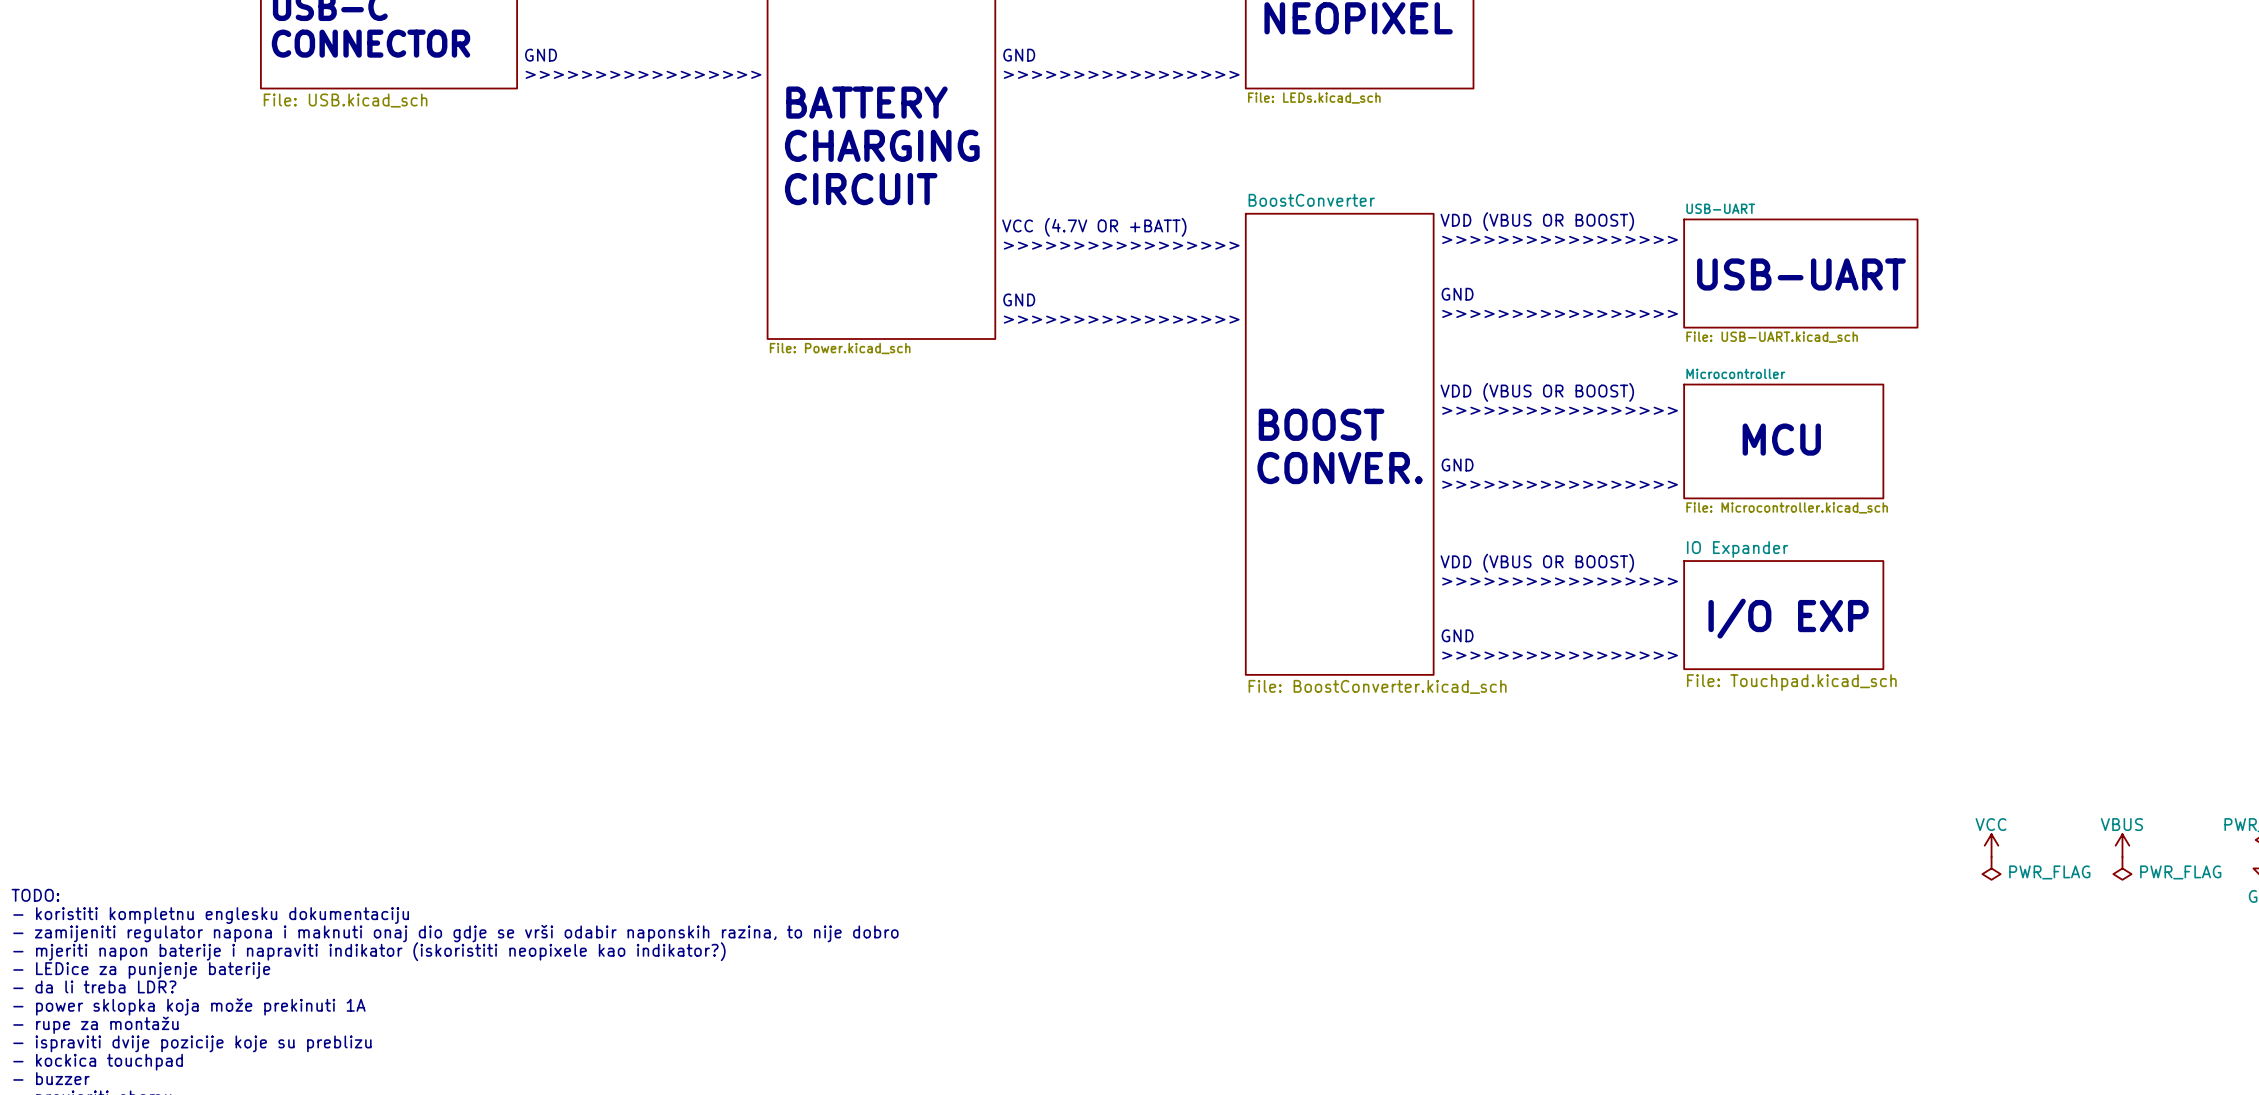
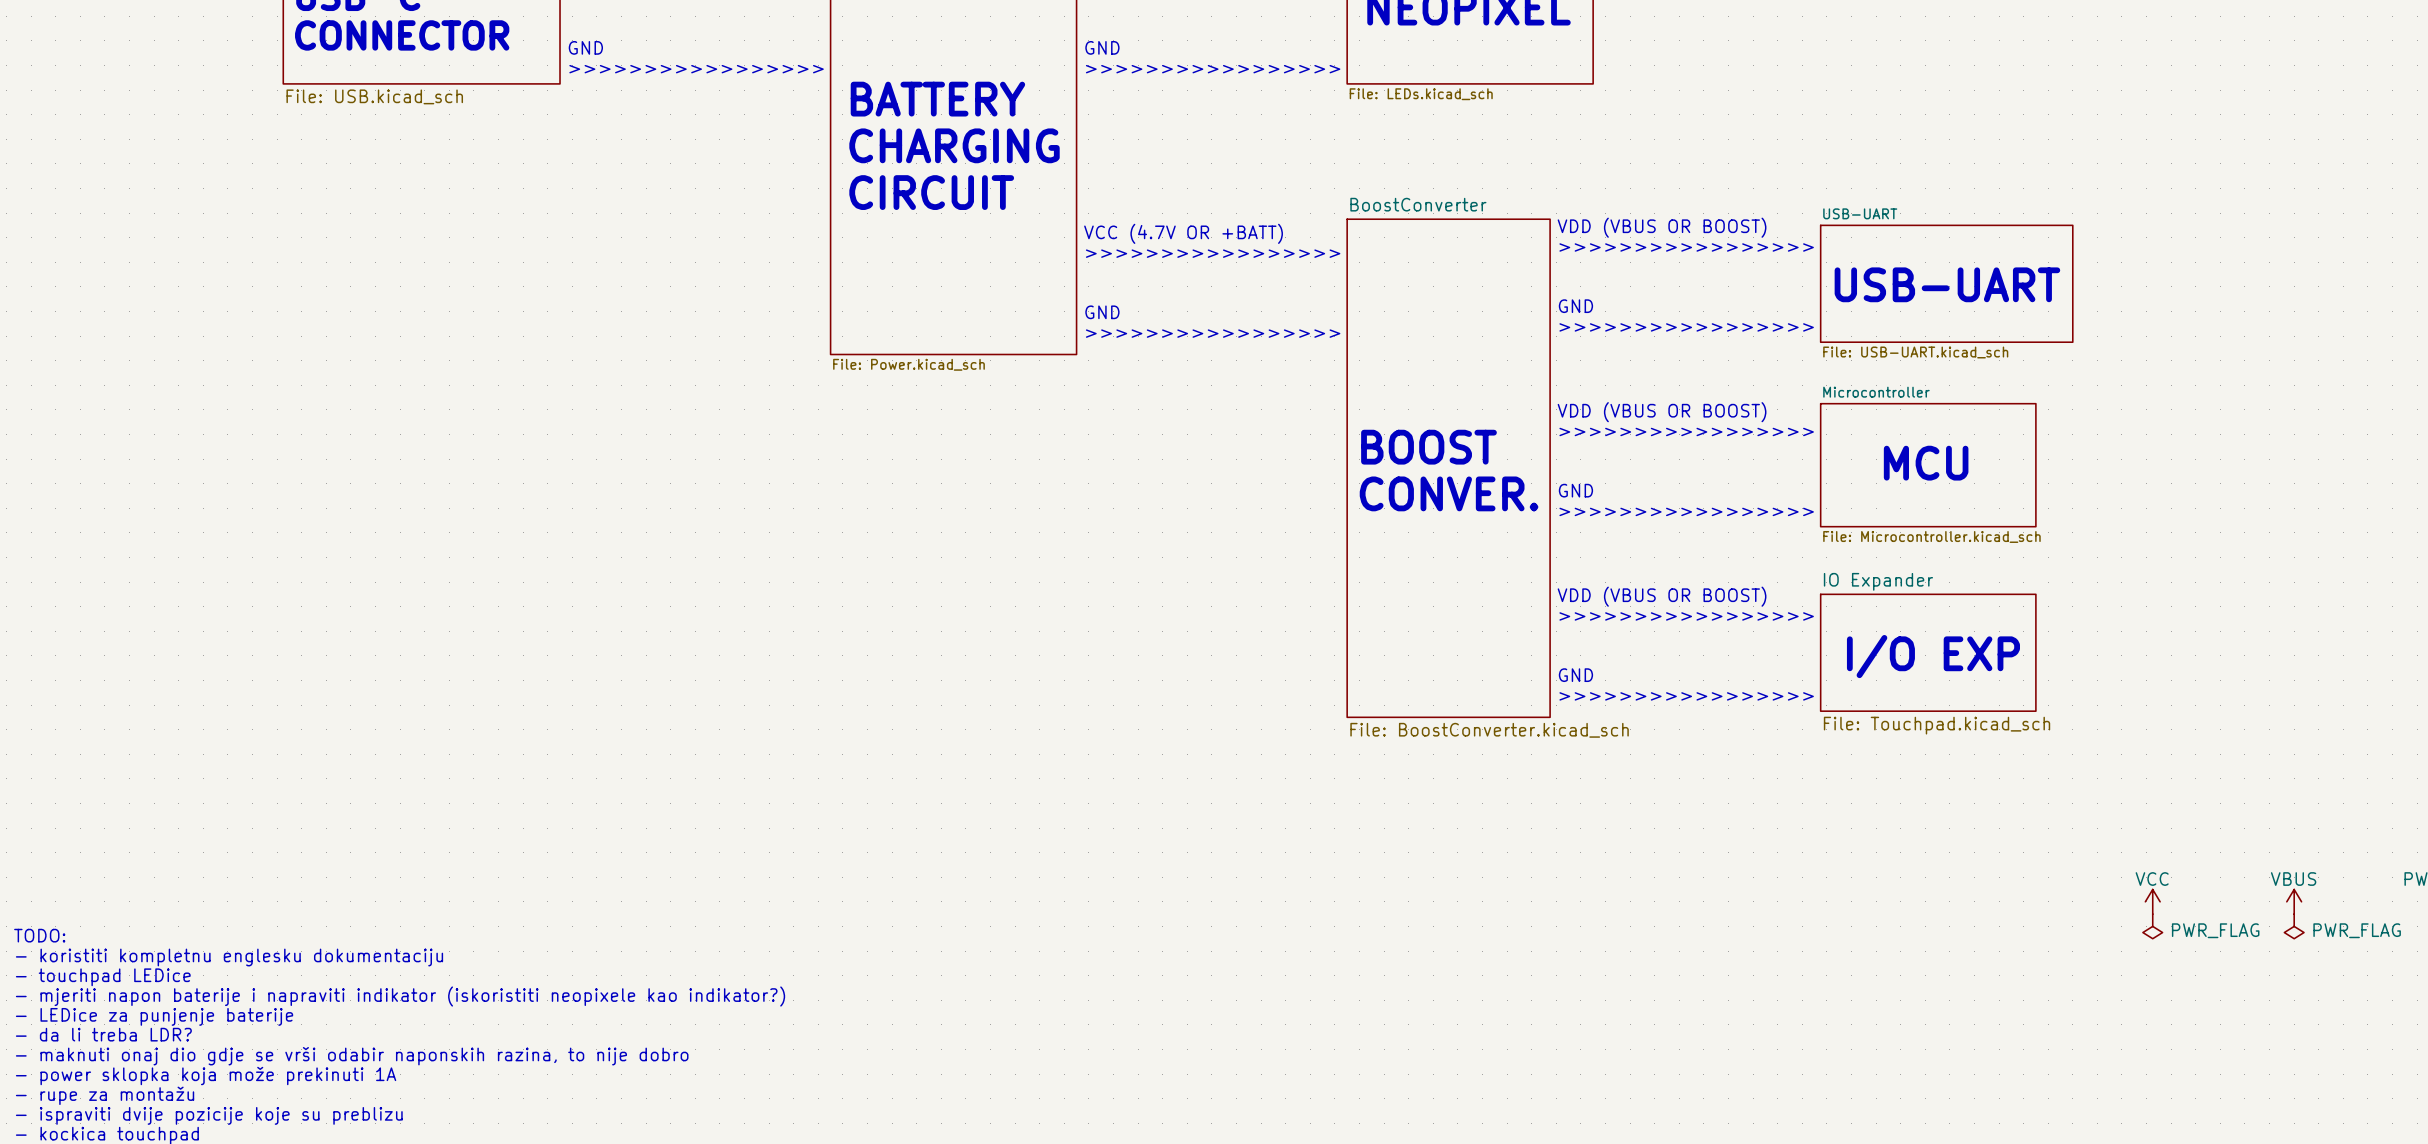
text: none -> TODO: (39, 935)
text: TODO: (35, 895) -> - koristiti kompletnu englesku dokumentaciju (229, 957)
text: - koristiti kompletnu englesku dokumentaciju (211, 915) -> - touchpad LEDice (103, 977)
text: - zamijeniti regulator napona i maknuti onaj dio gdje se vrši odabir naponskih razina, to nije dobro (455, 933) -> - mjeriti napon baterije i napraviti indikator (iskoristiti neopixele kao indikator?) (400, 996)
text: - mjeriti napon baterije i napraviti indikator (iskoristiti neopixele kao indikator?) (369, 951) -> - LEDice za punjenje baterije (154, 1016)
text: - LEDice za punjenje baterije (141, 970) -> - da li treba LDR? (103, 1034)
text: - da li treba LDR? (94, 986) -> - maknuti onaj dio gdje se vrši odabir naponskih razina, to nije dobro (352, 1056)

